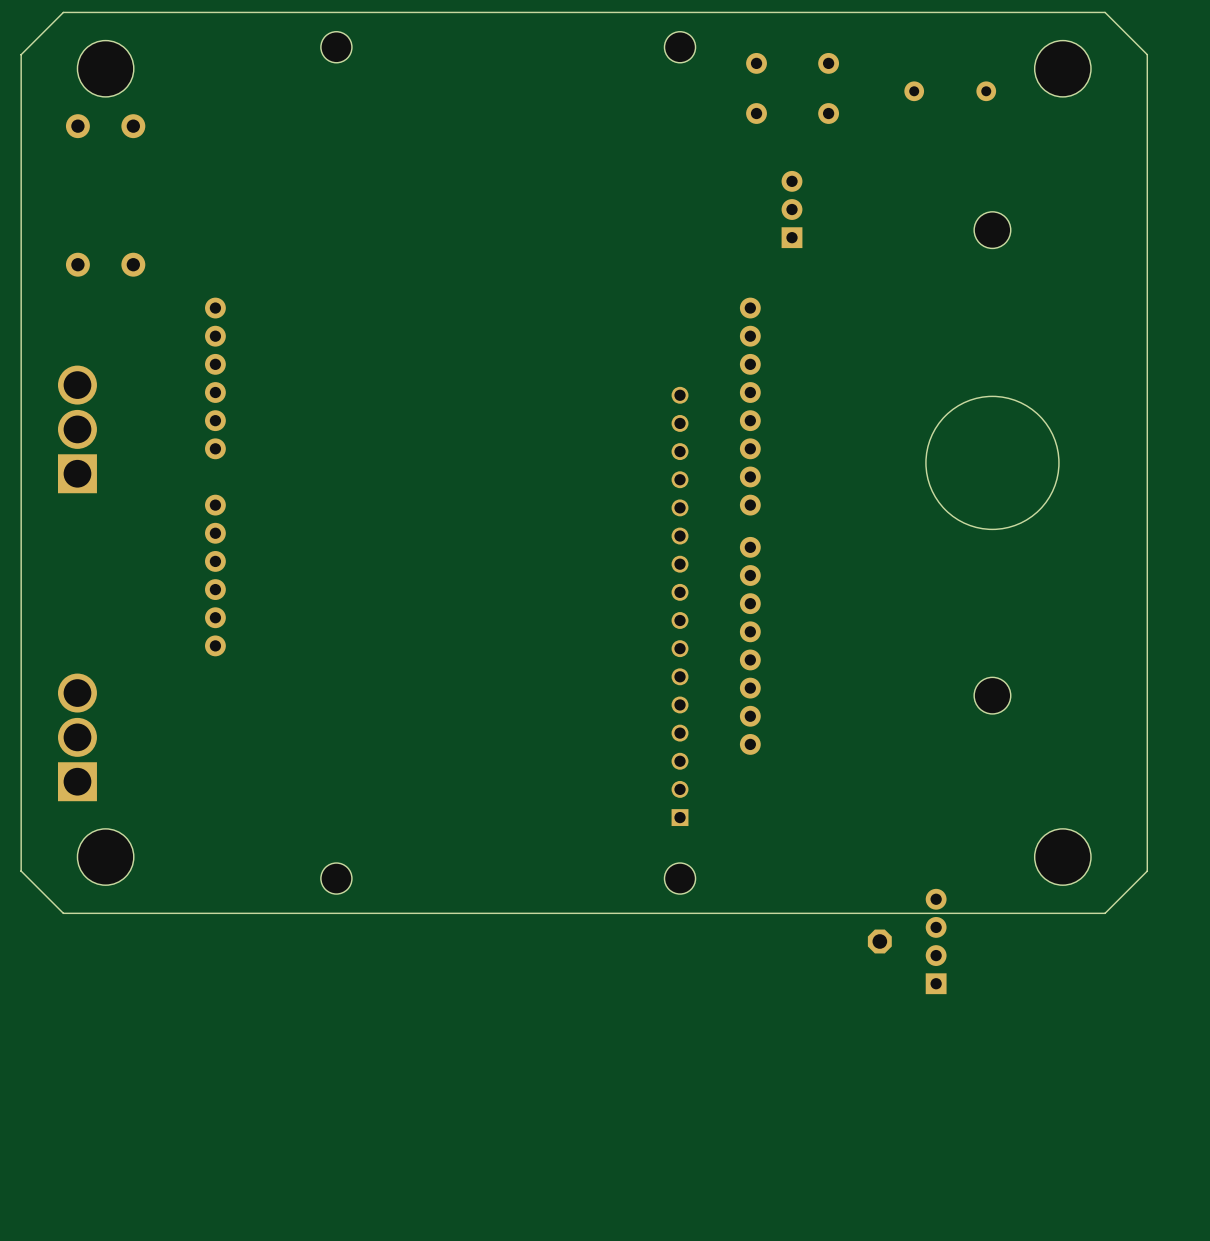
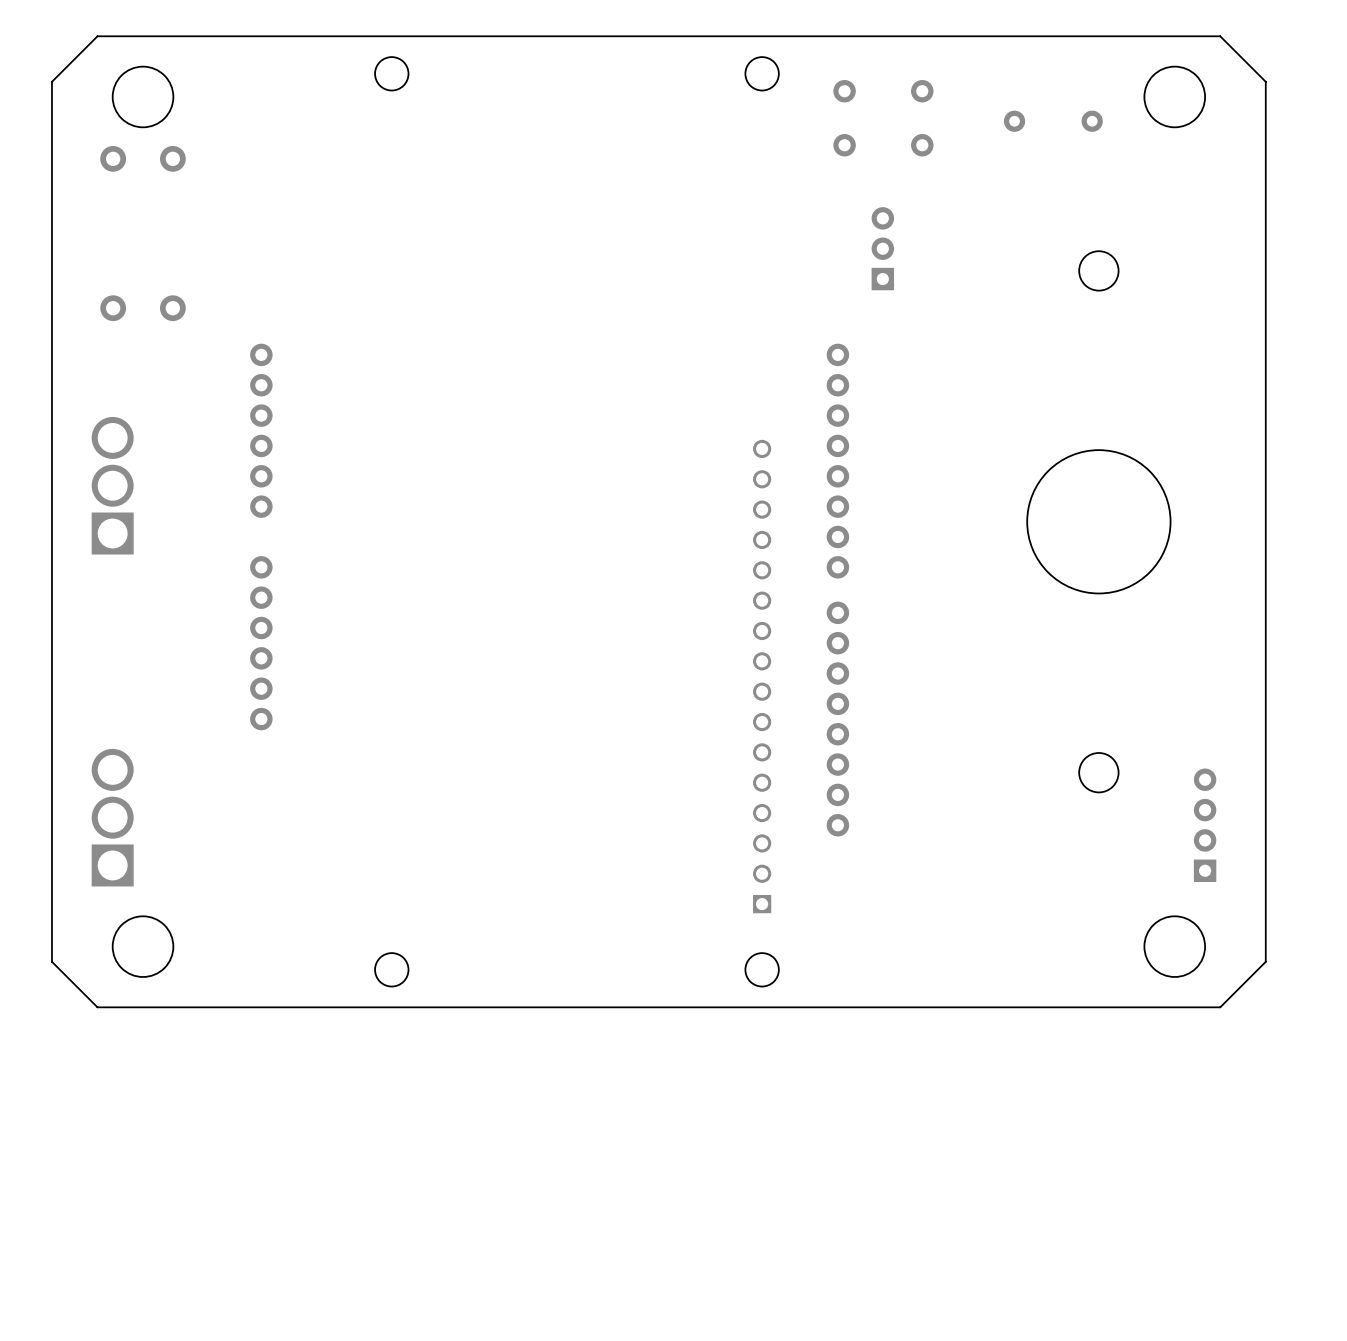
part: (879, 941) -> none
part position: (936, 941) -> (1205, 825)

